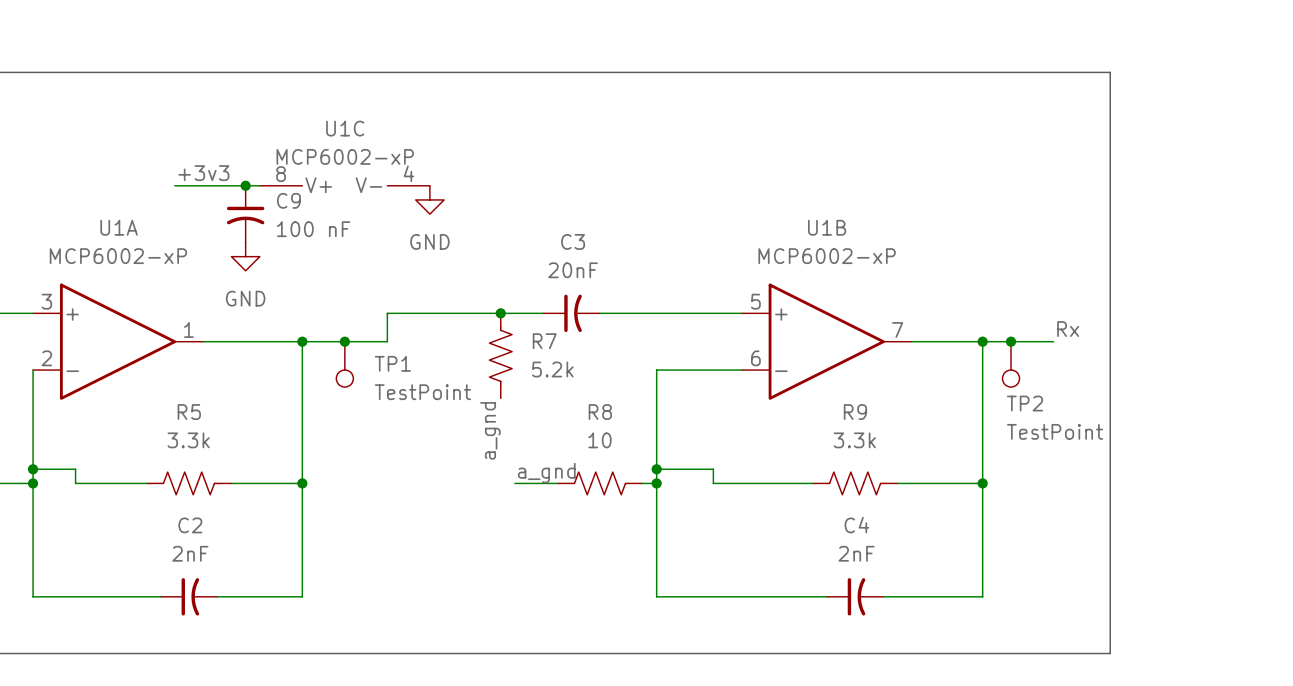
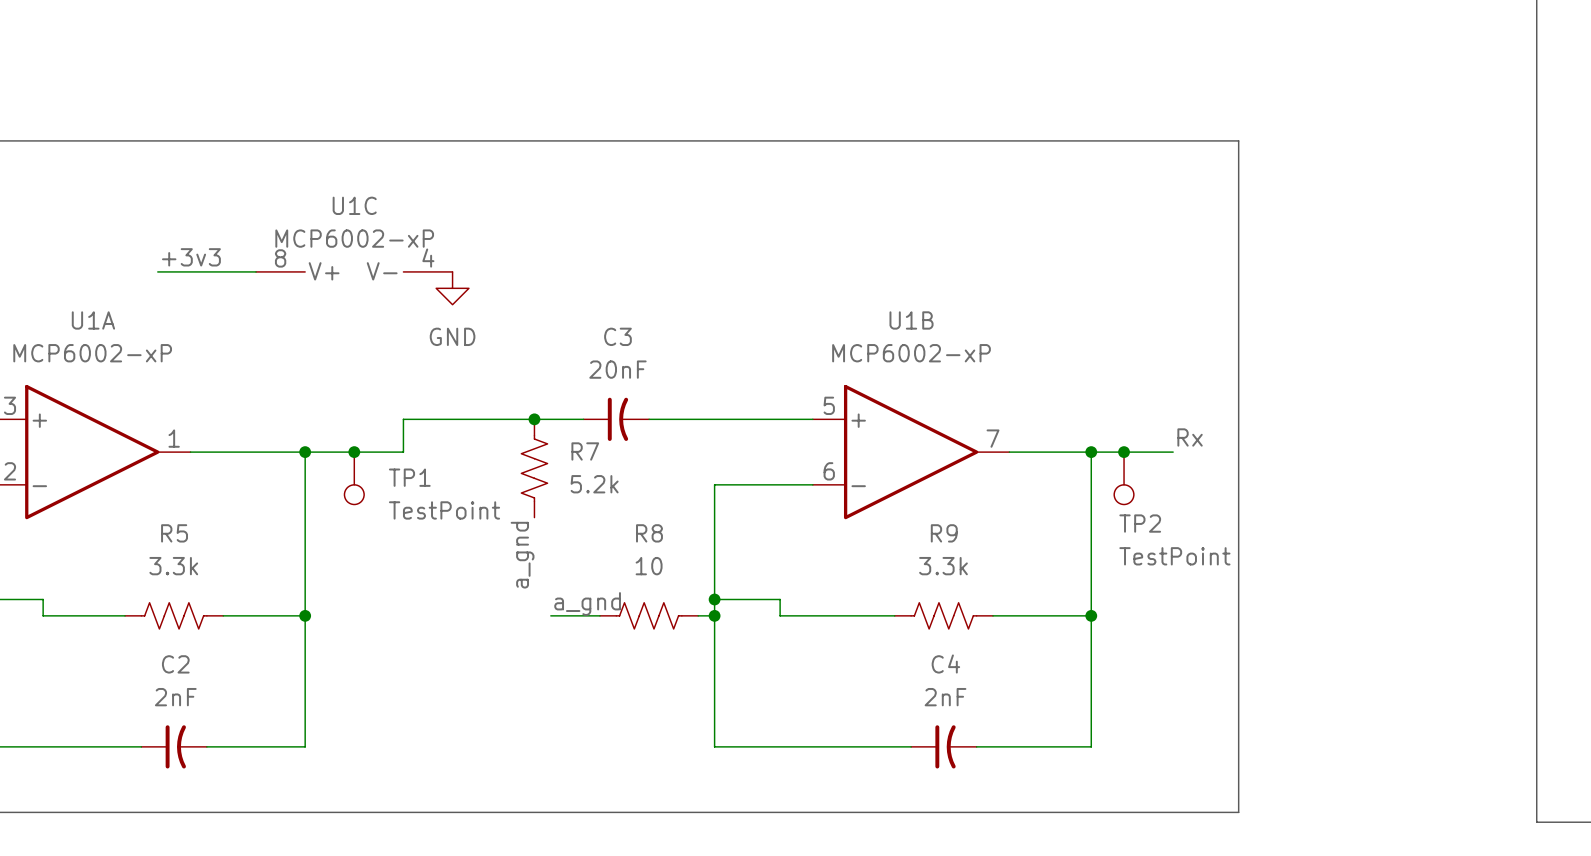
junction: (245, 185) -> none
C9: 100 nF (245, 214) -> none
power symbol: GND (245, 256) -> none

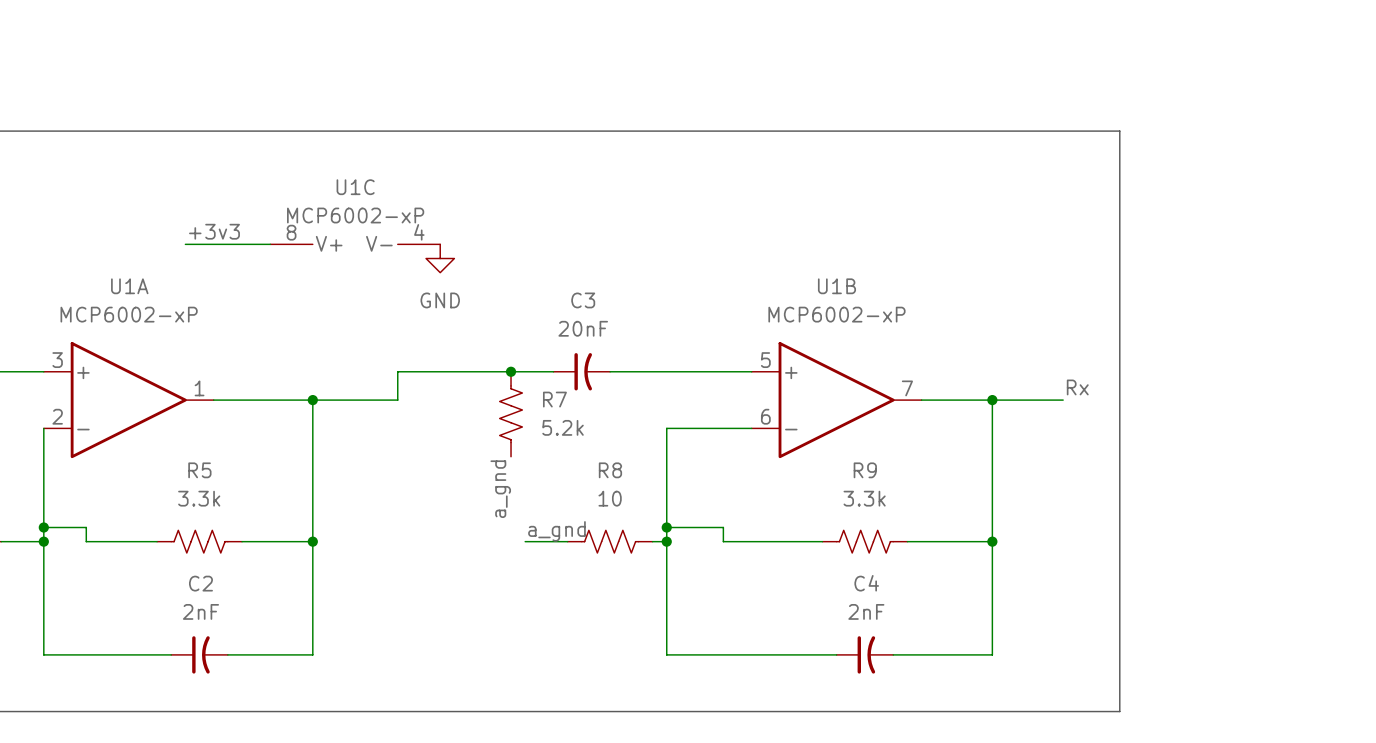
junction: (354, 452) -> none
junction: (1124, 452) -> none
TP1: TestPoint (354, 478) -> none
TP2: TestPoint (1124, 478) -> none

